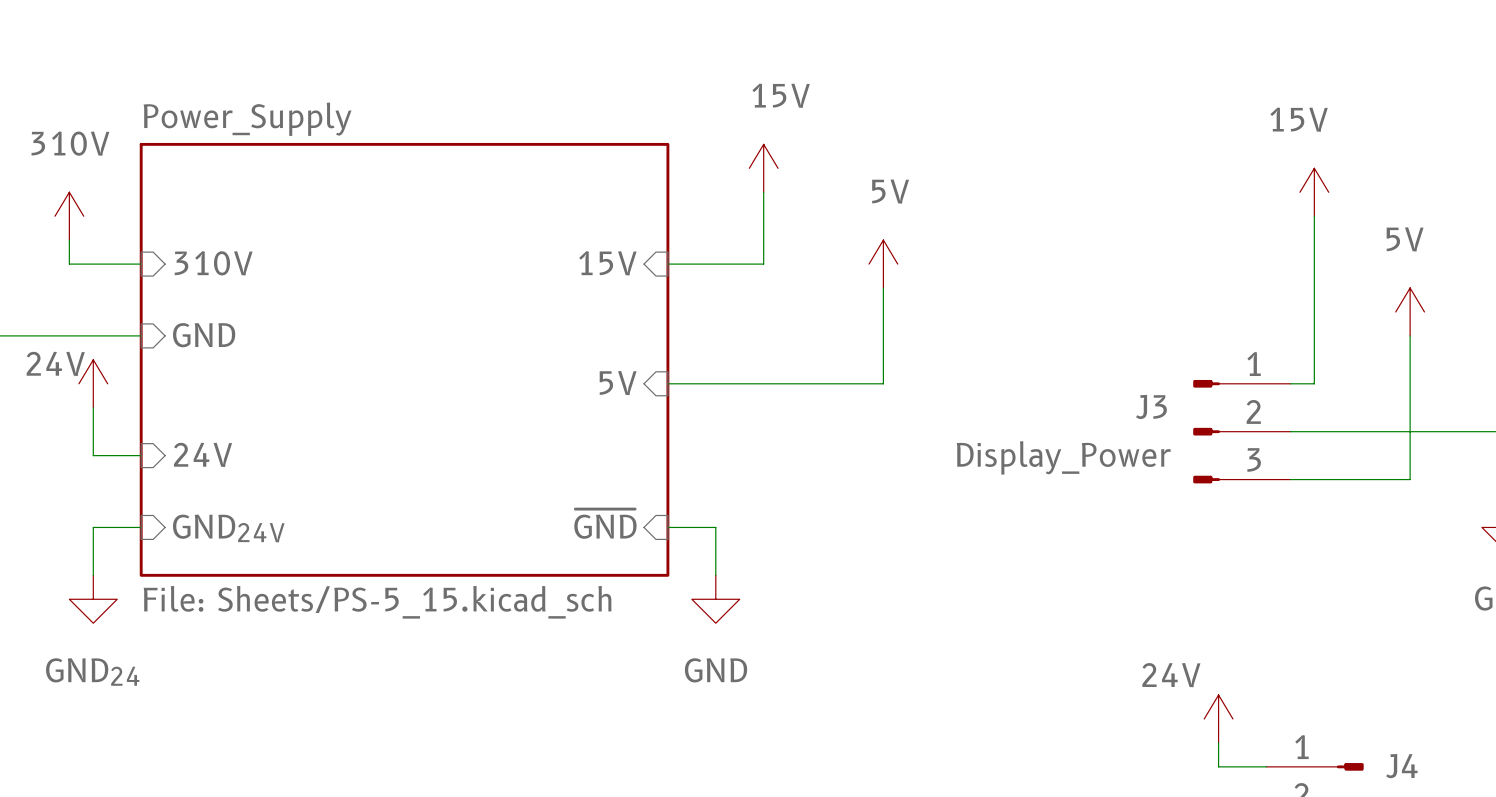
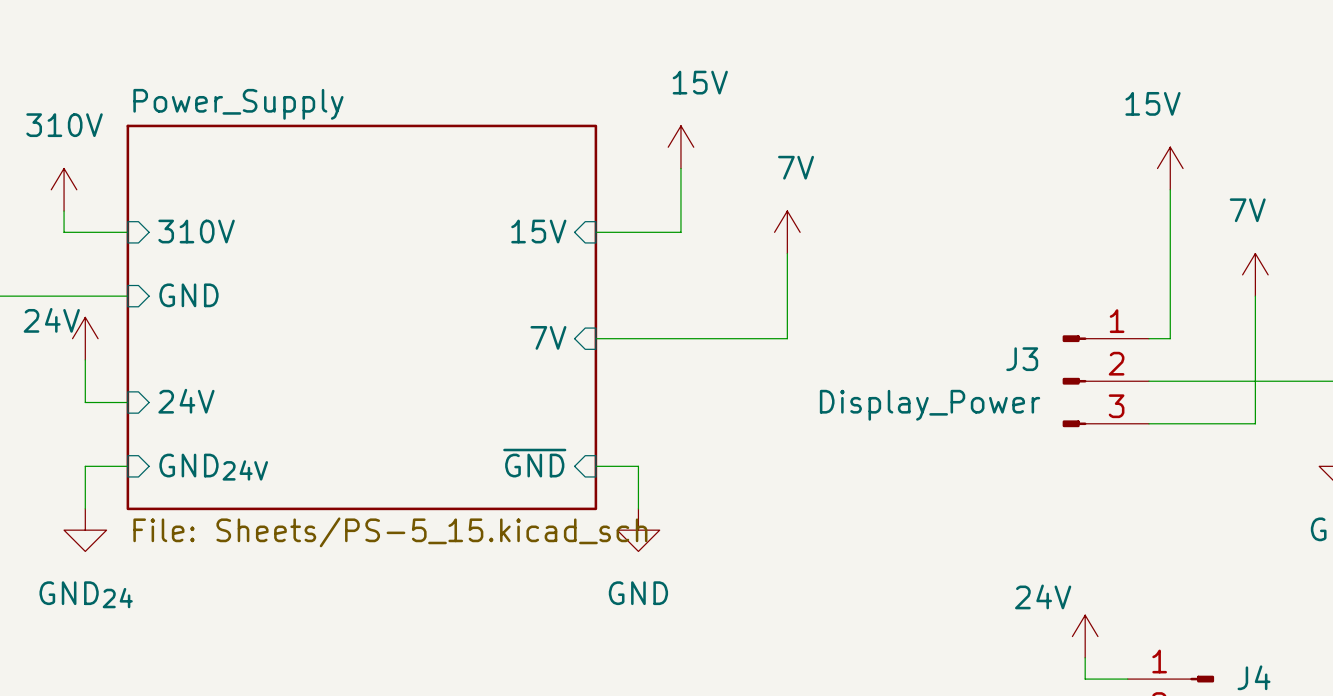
power symbol: 5V (883, 264) -> 7V (787, 232)
power symbol: 5V (1410, 311) -> 7V (1255, 274)
sheet pin: 5V (618, 383) -> 7V (548, 337)

